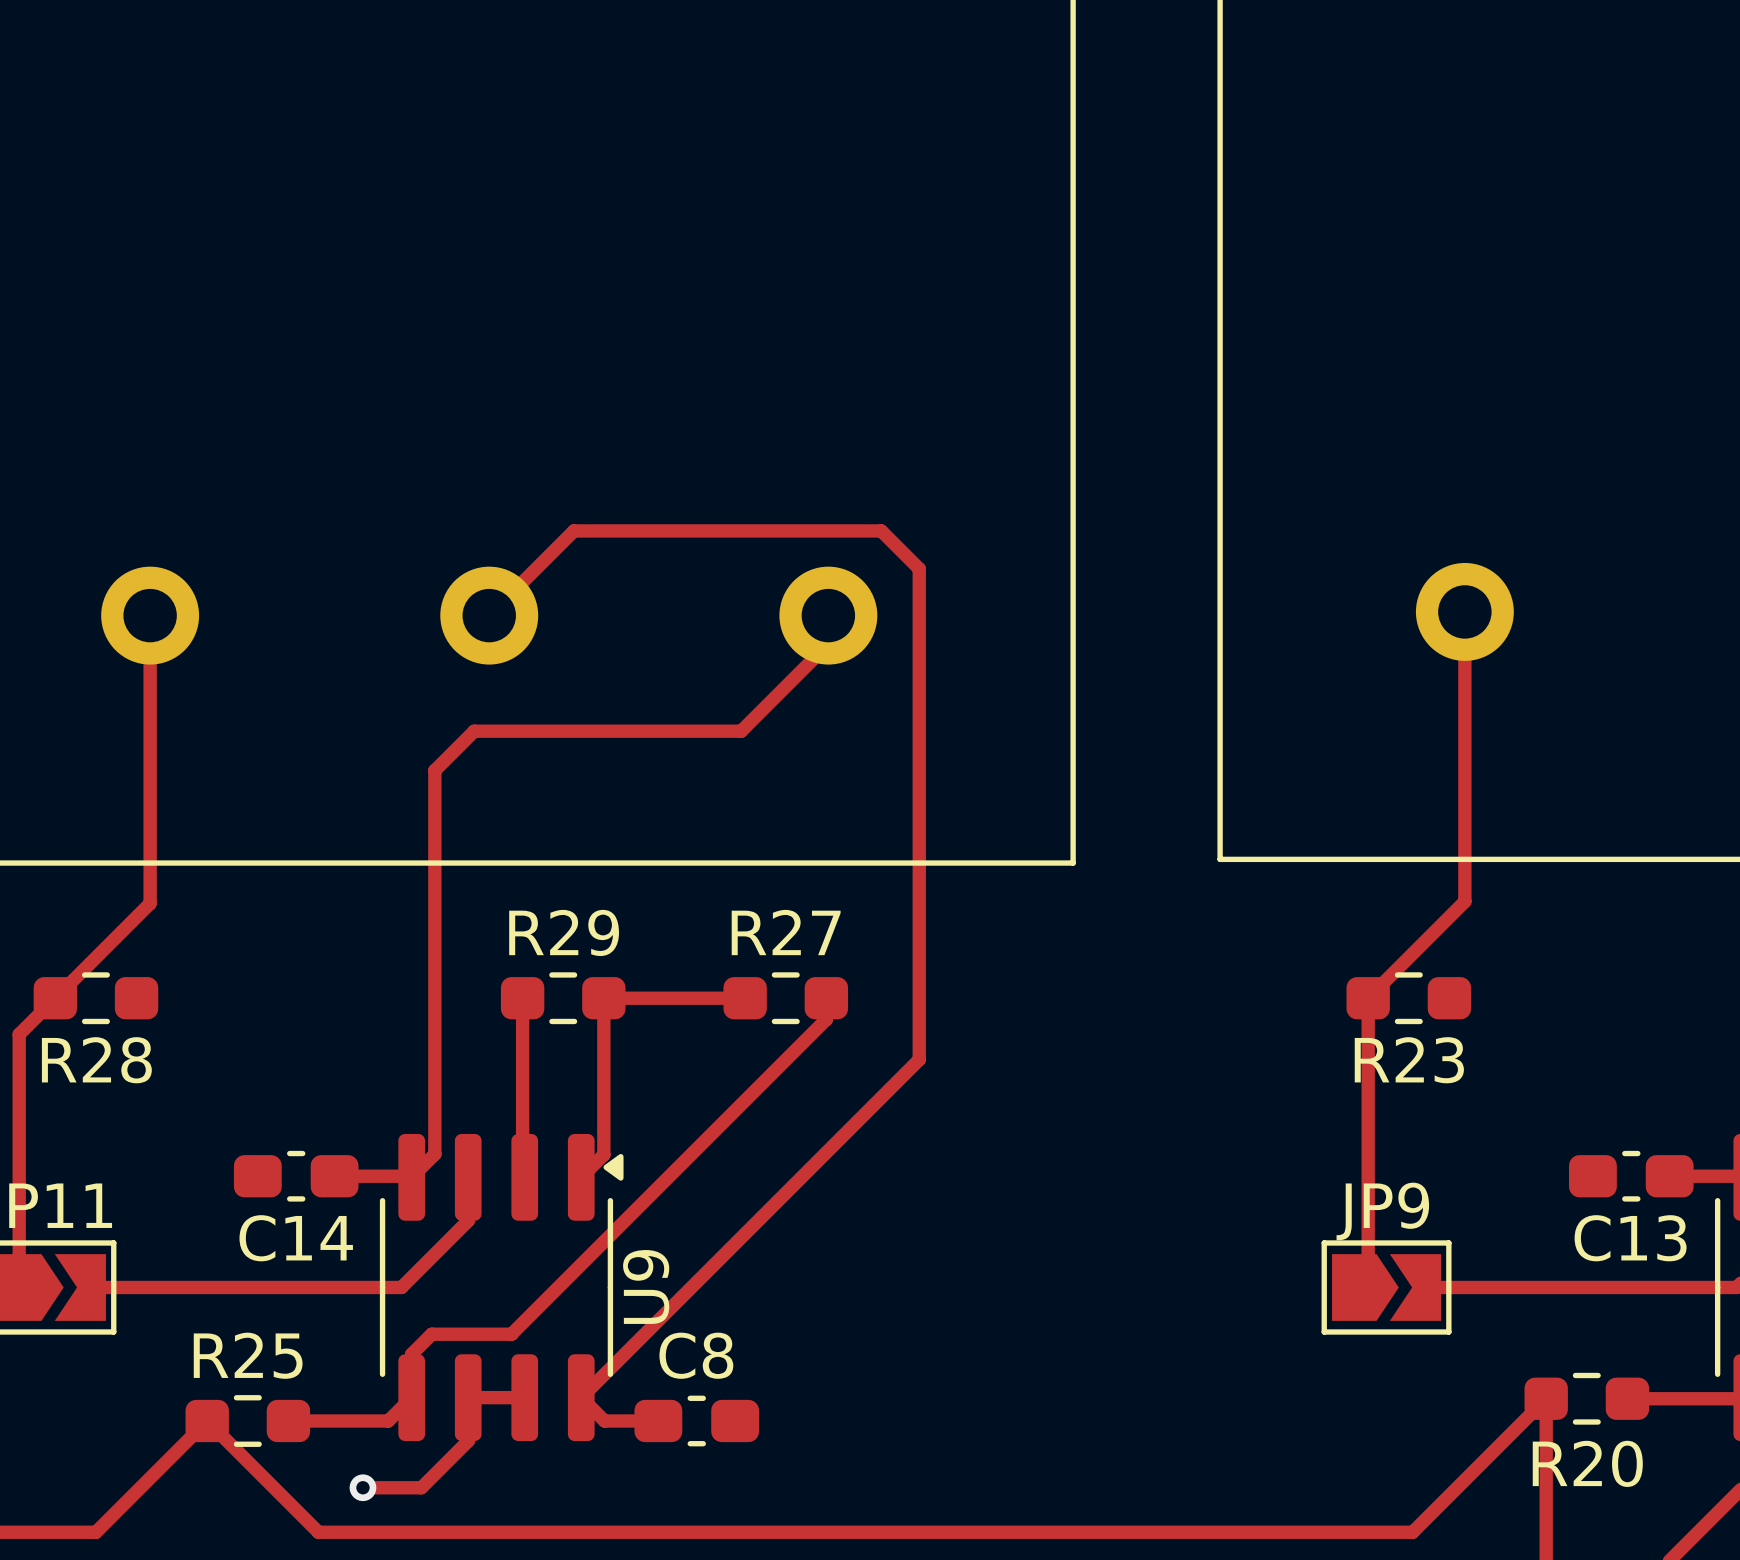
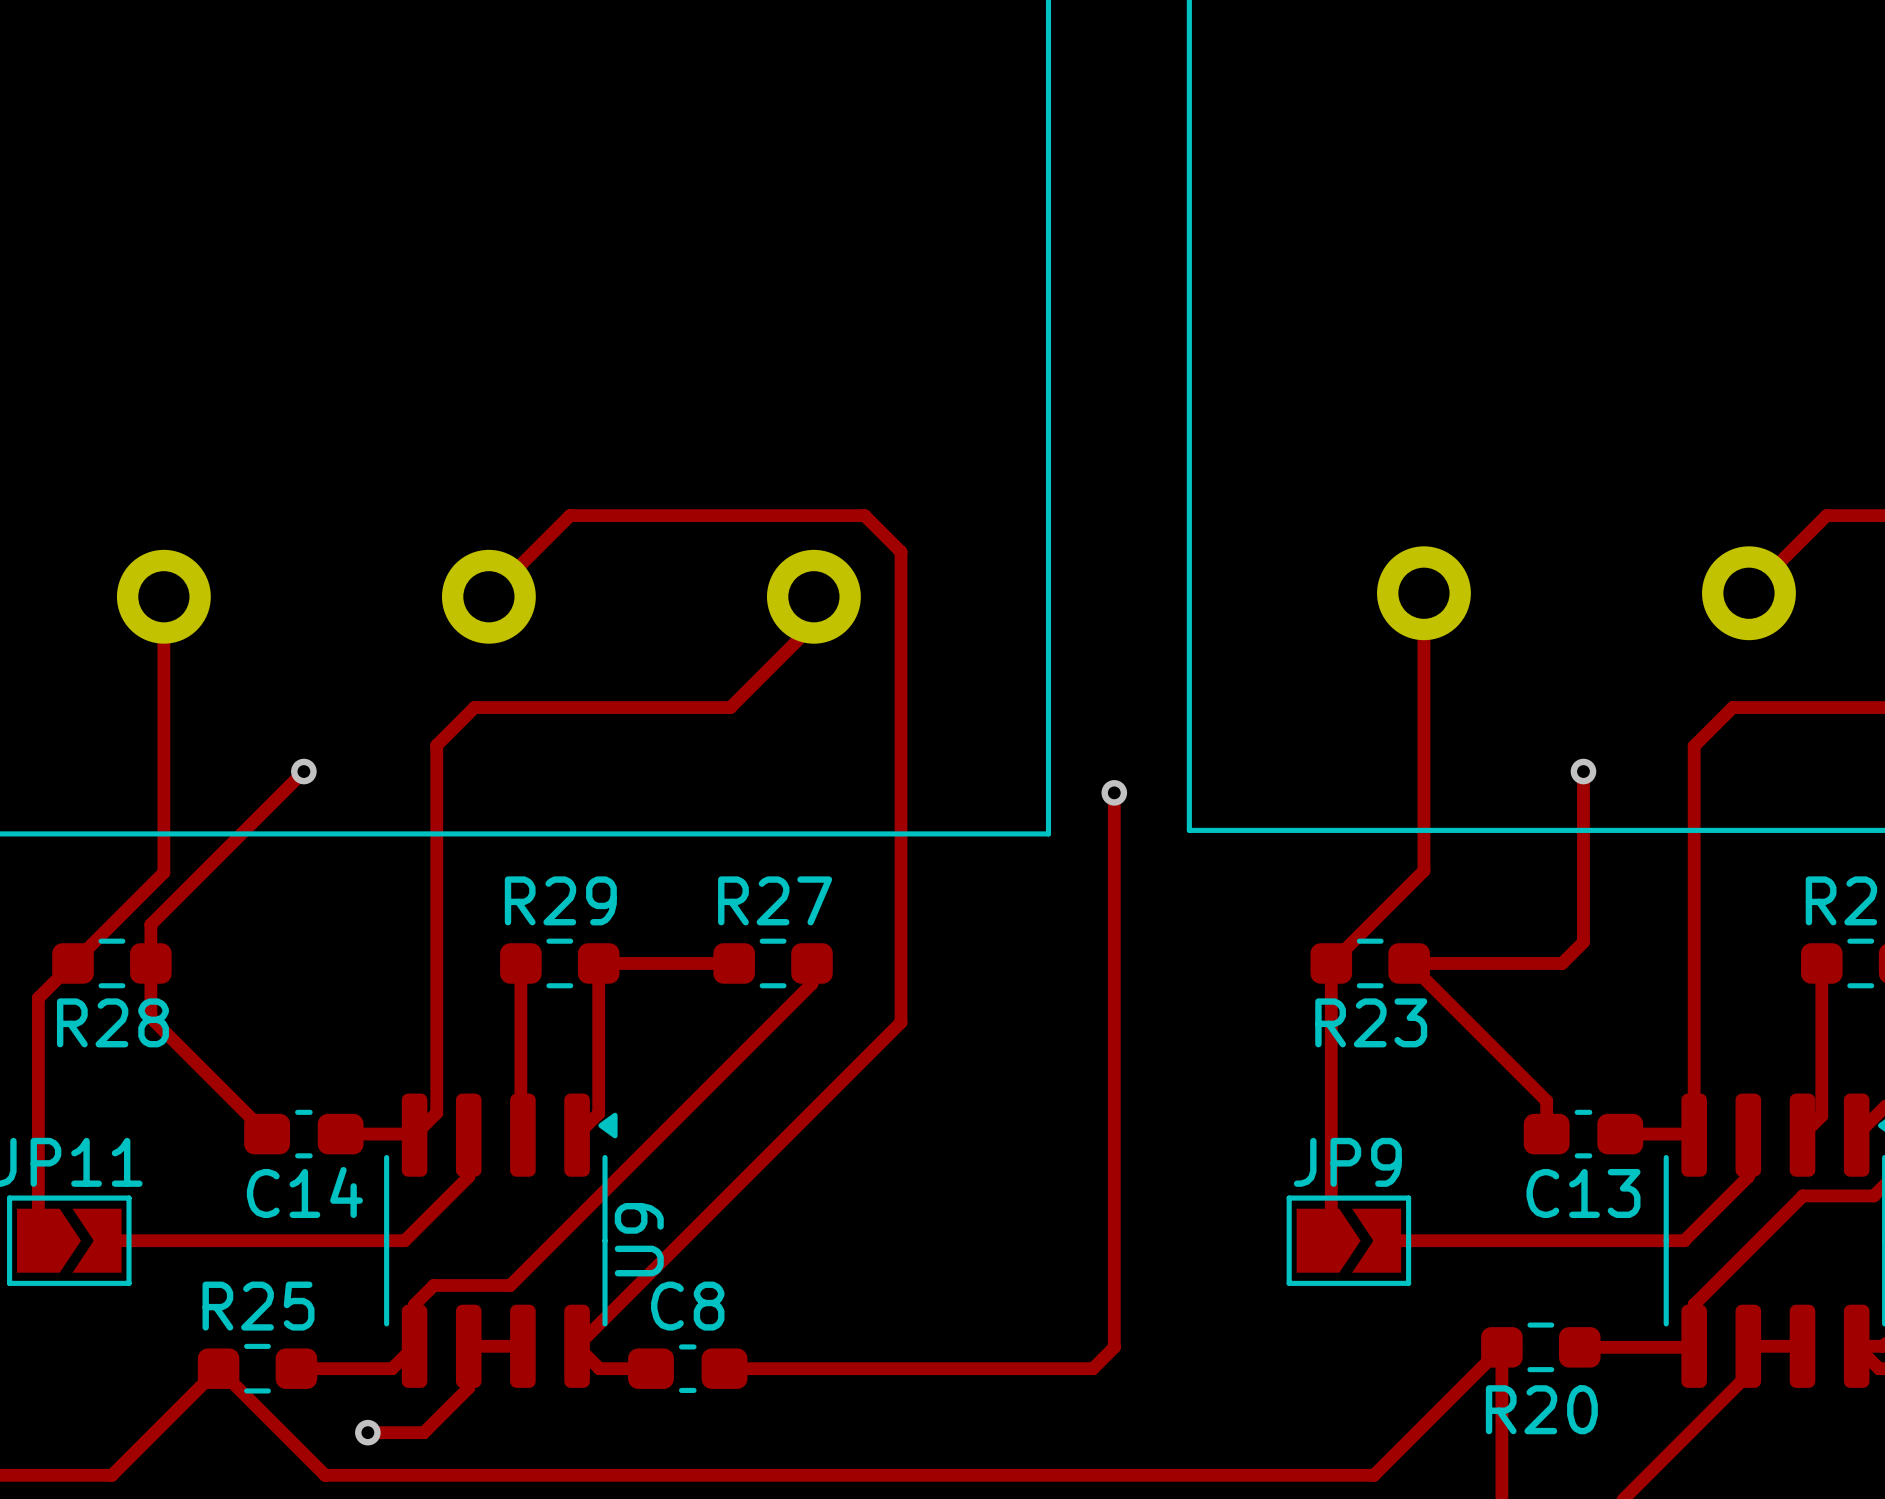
track: none -> (303, 771) (150, 924) (150, 1017) (267, 1134)
via: none -> (303, 771)
track: none -> (1583, 771) (1583, 942) (1562, 963) (1409, 963) (1546, 1101) (1546, 1134)
via: none -> (1583, 771)
track: none -> (1114, 792) (1114, 1347) (1092, 1368) (724, 1368)
via: none -> (1114, 792)

